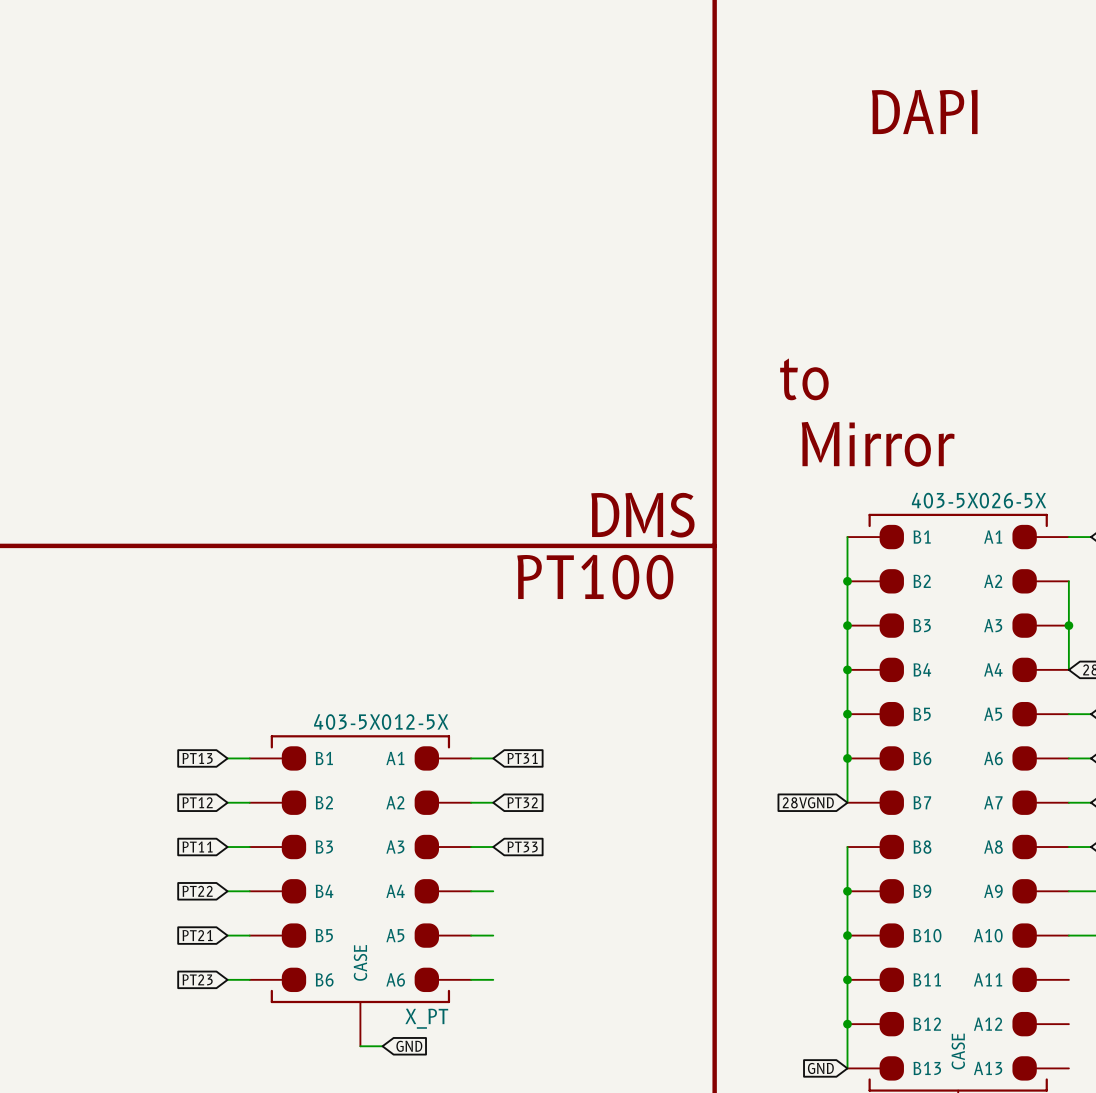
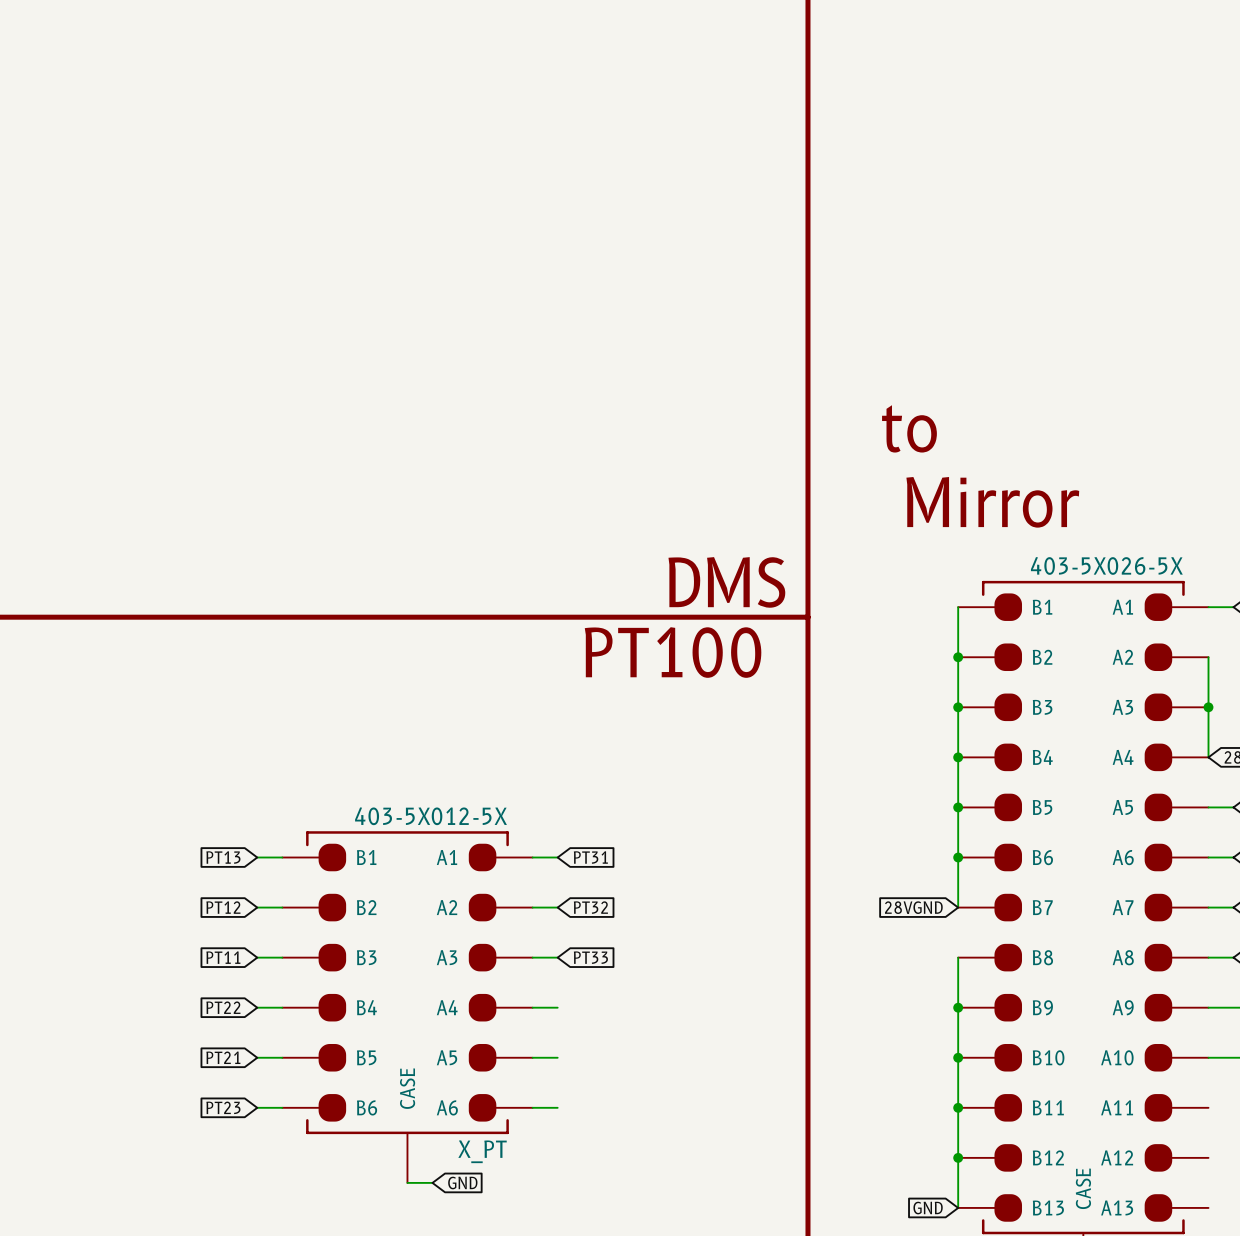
text: DAPI (924, 111) -> none

